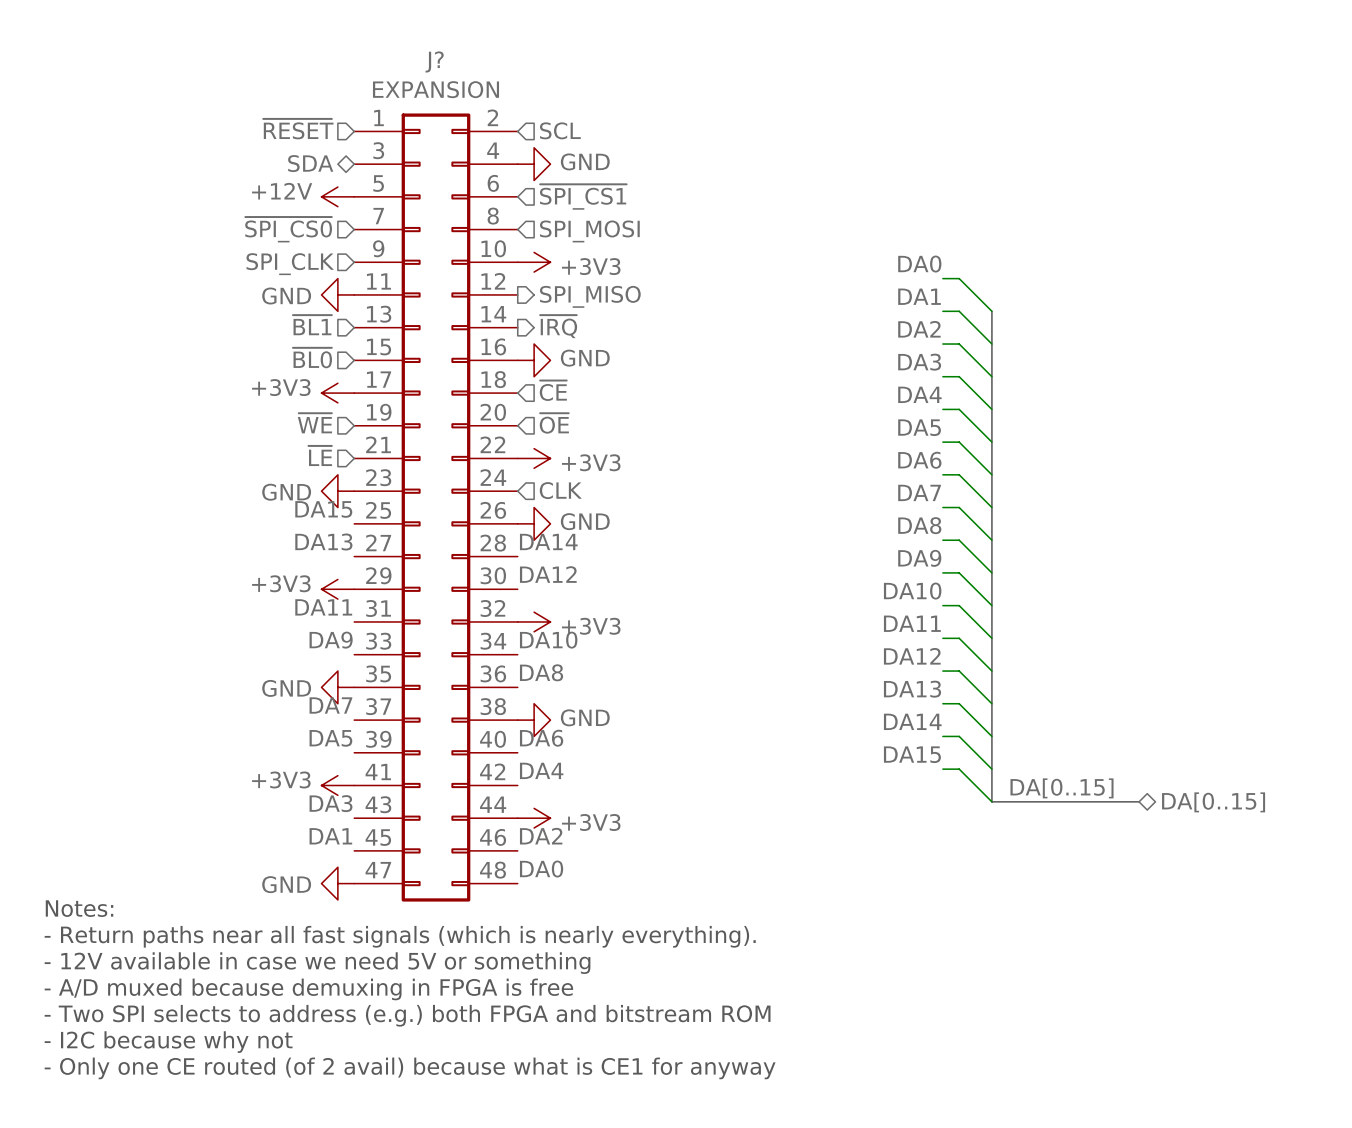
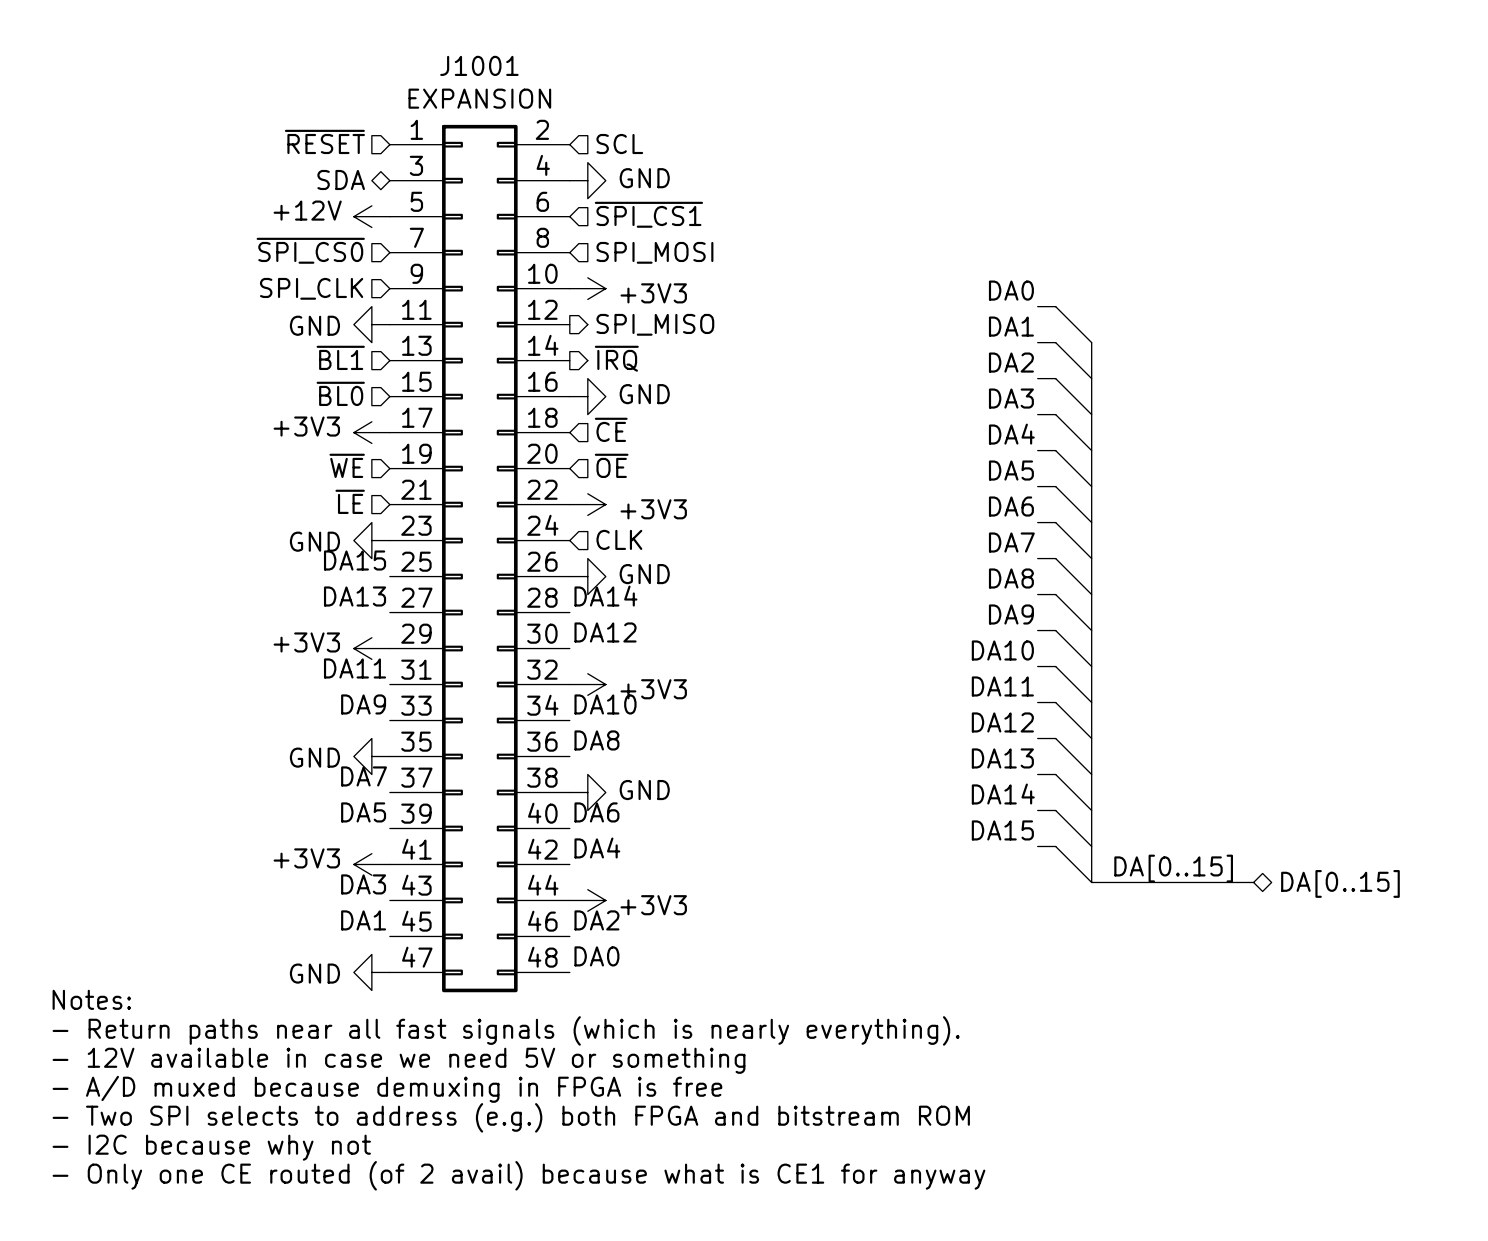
J? name: J? (434, 61) -> J1001 (479, 65)

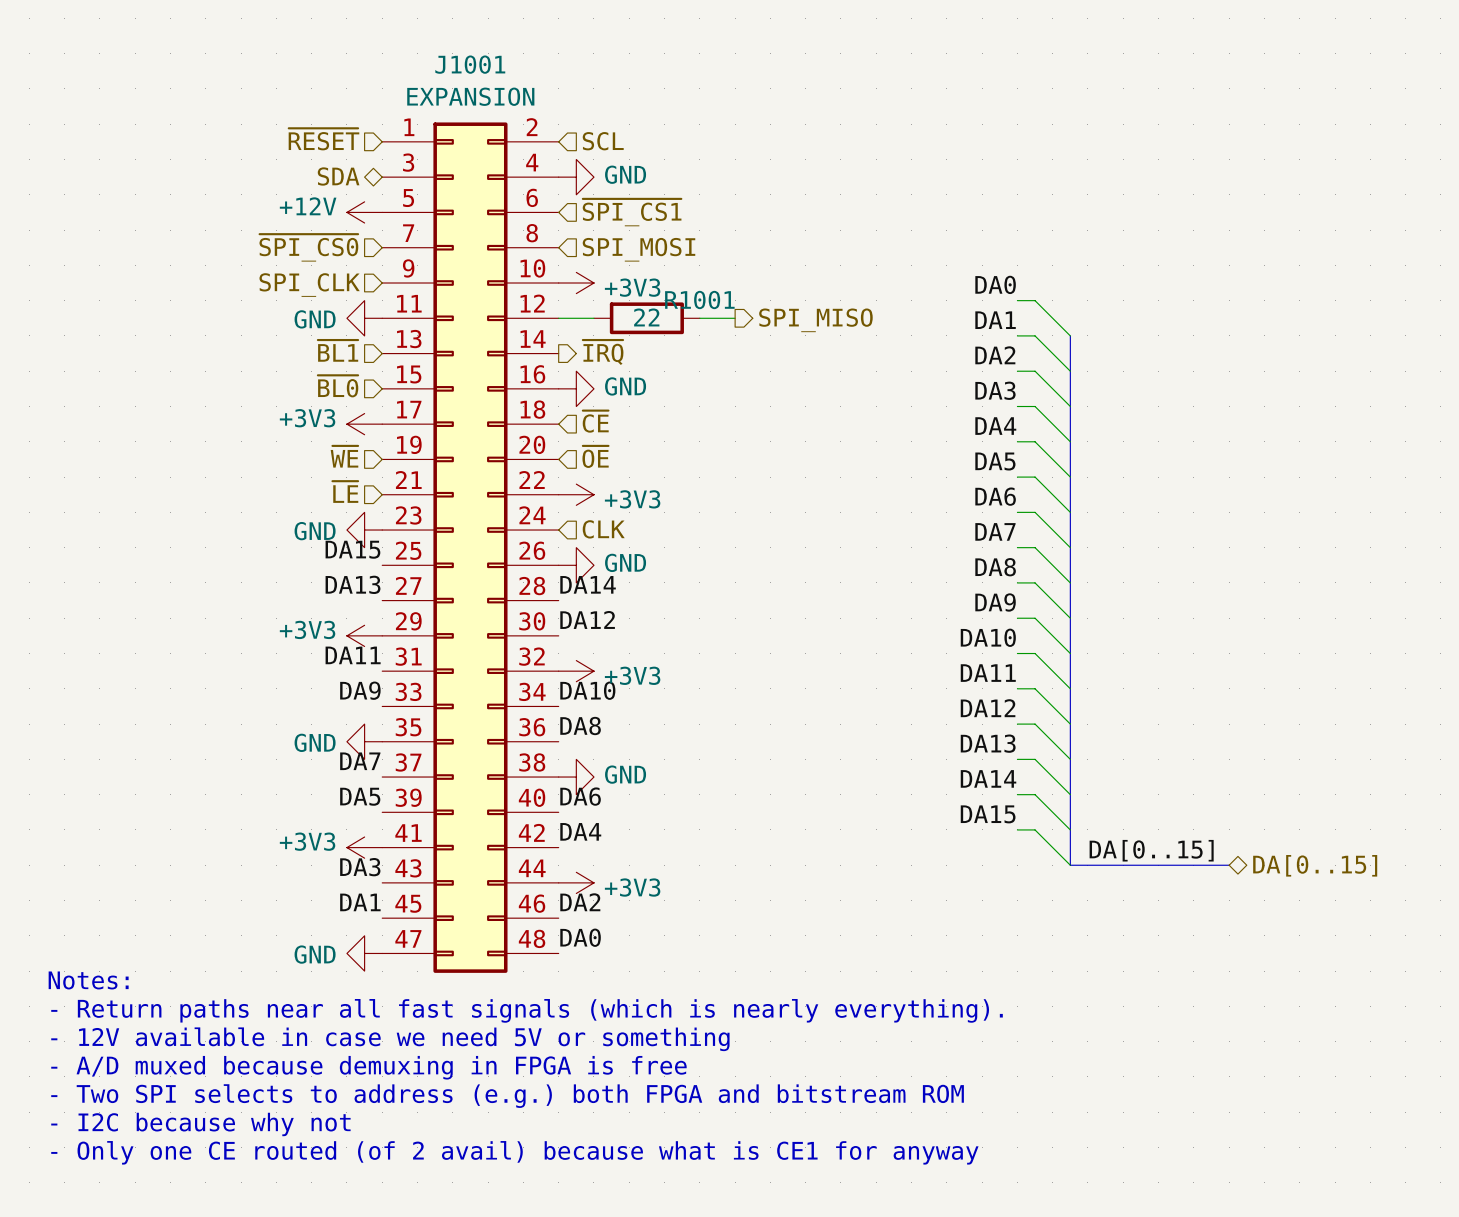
wire: none -> (558, 318) (593, 318)
hierarchical label position: SPI_MISO (655, 324) -> SPI_MISO (815, 320)
R1001: none -> 22 (646, 318)
wire: none -> (699, 318) (735, 318)

